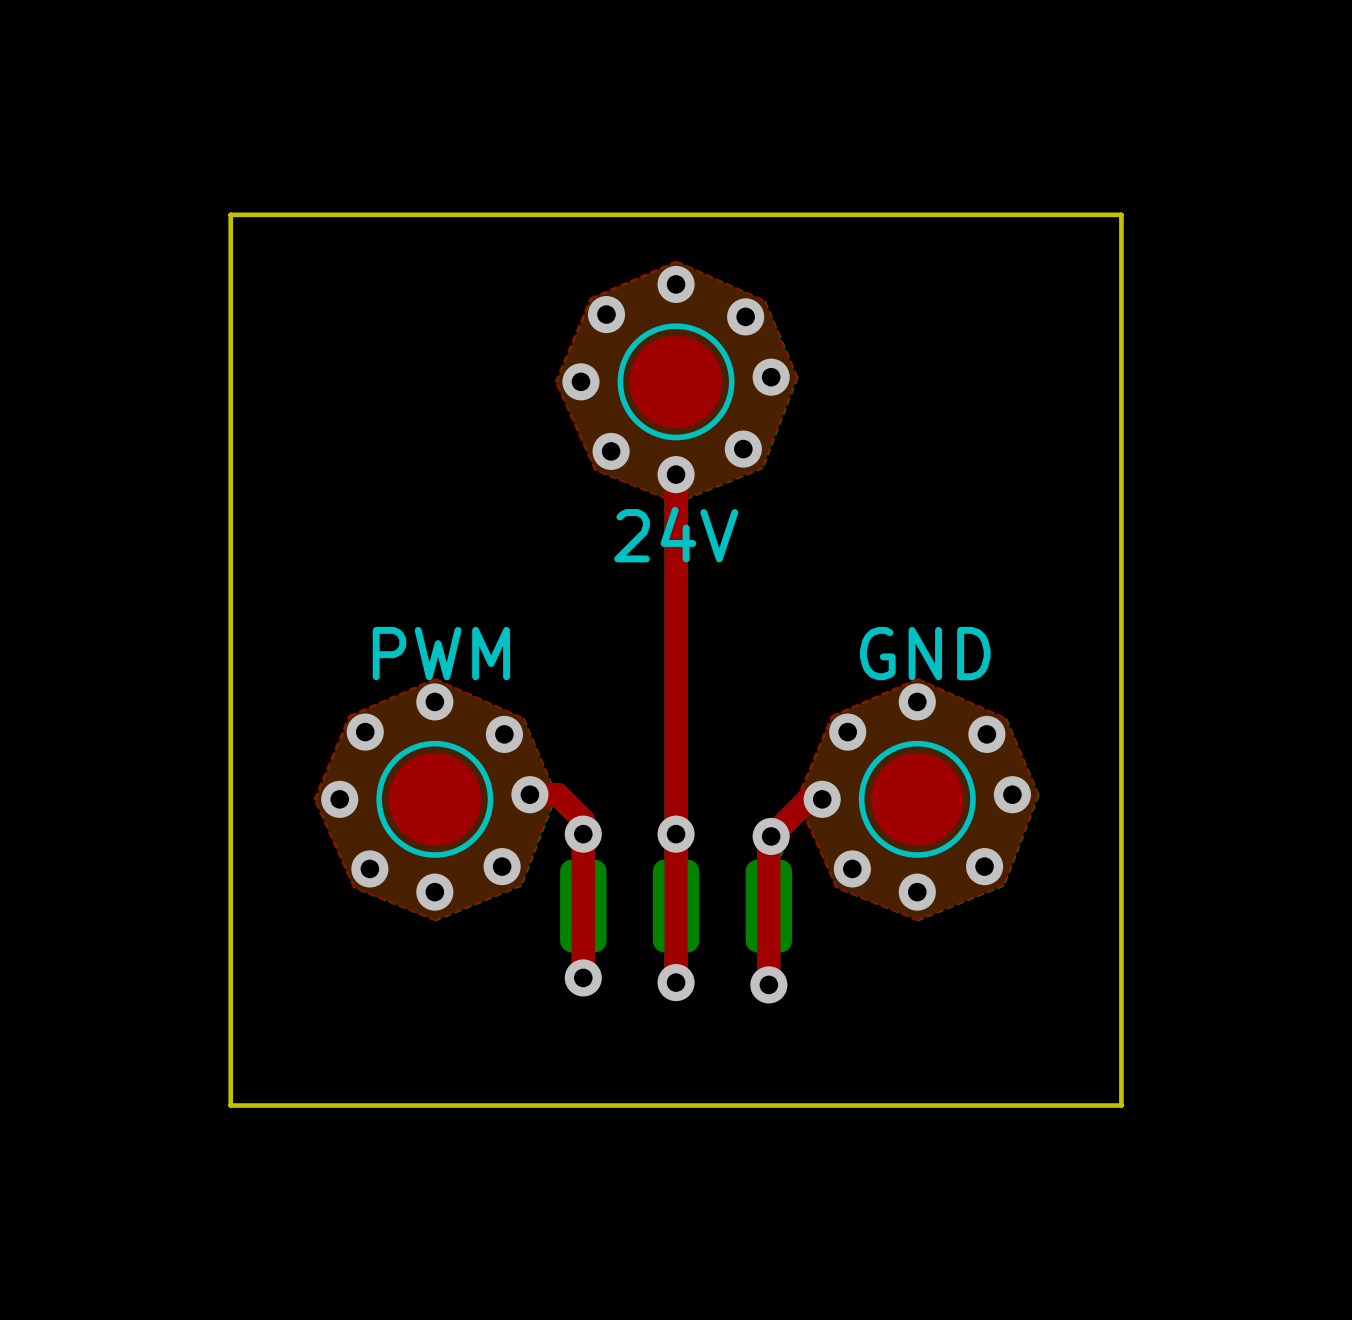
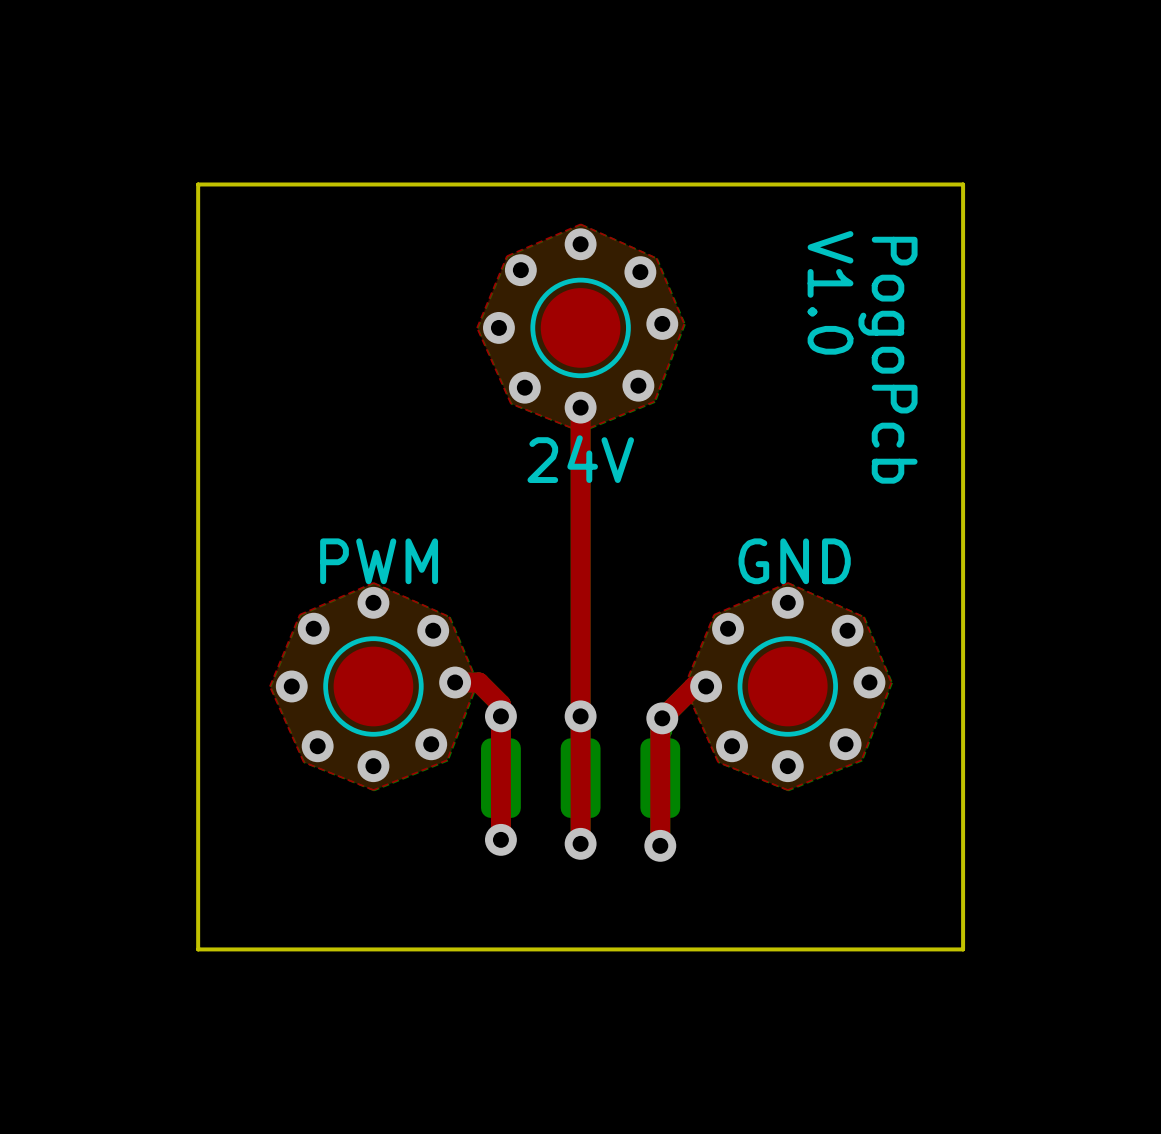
text: none -> V1.0 (830, 292)
text: none -> PogoPcb (888, 360)

